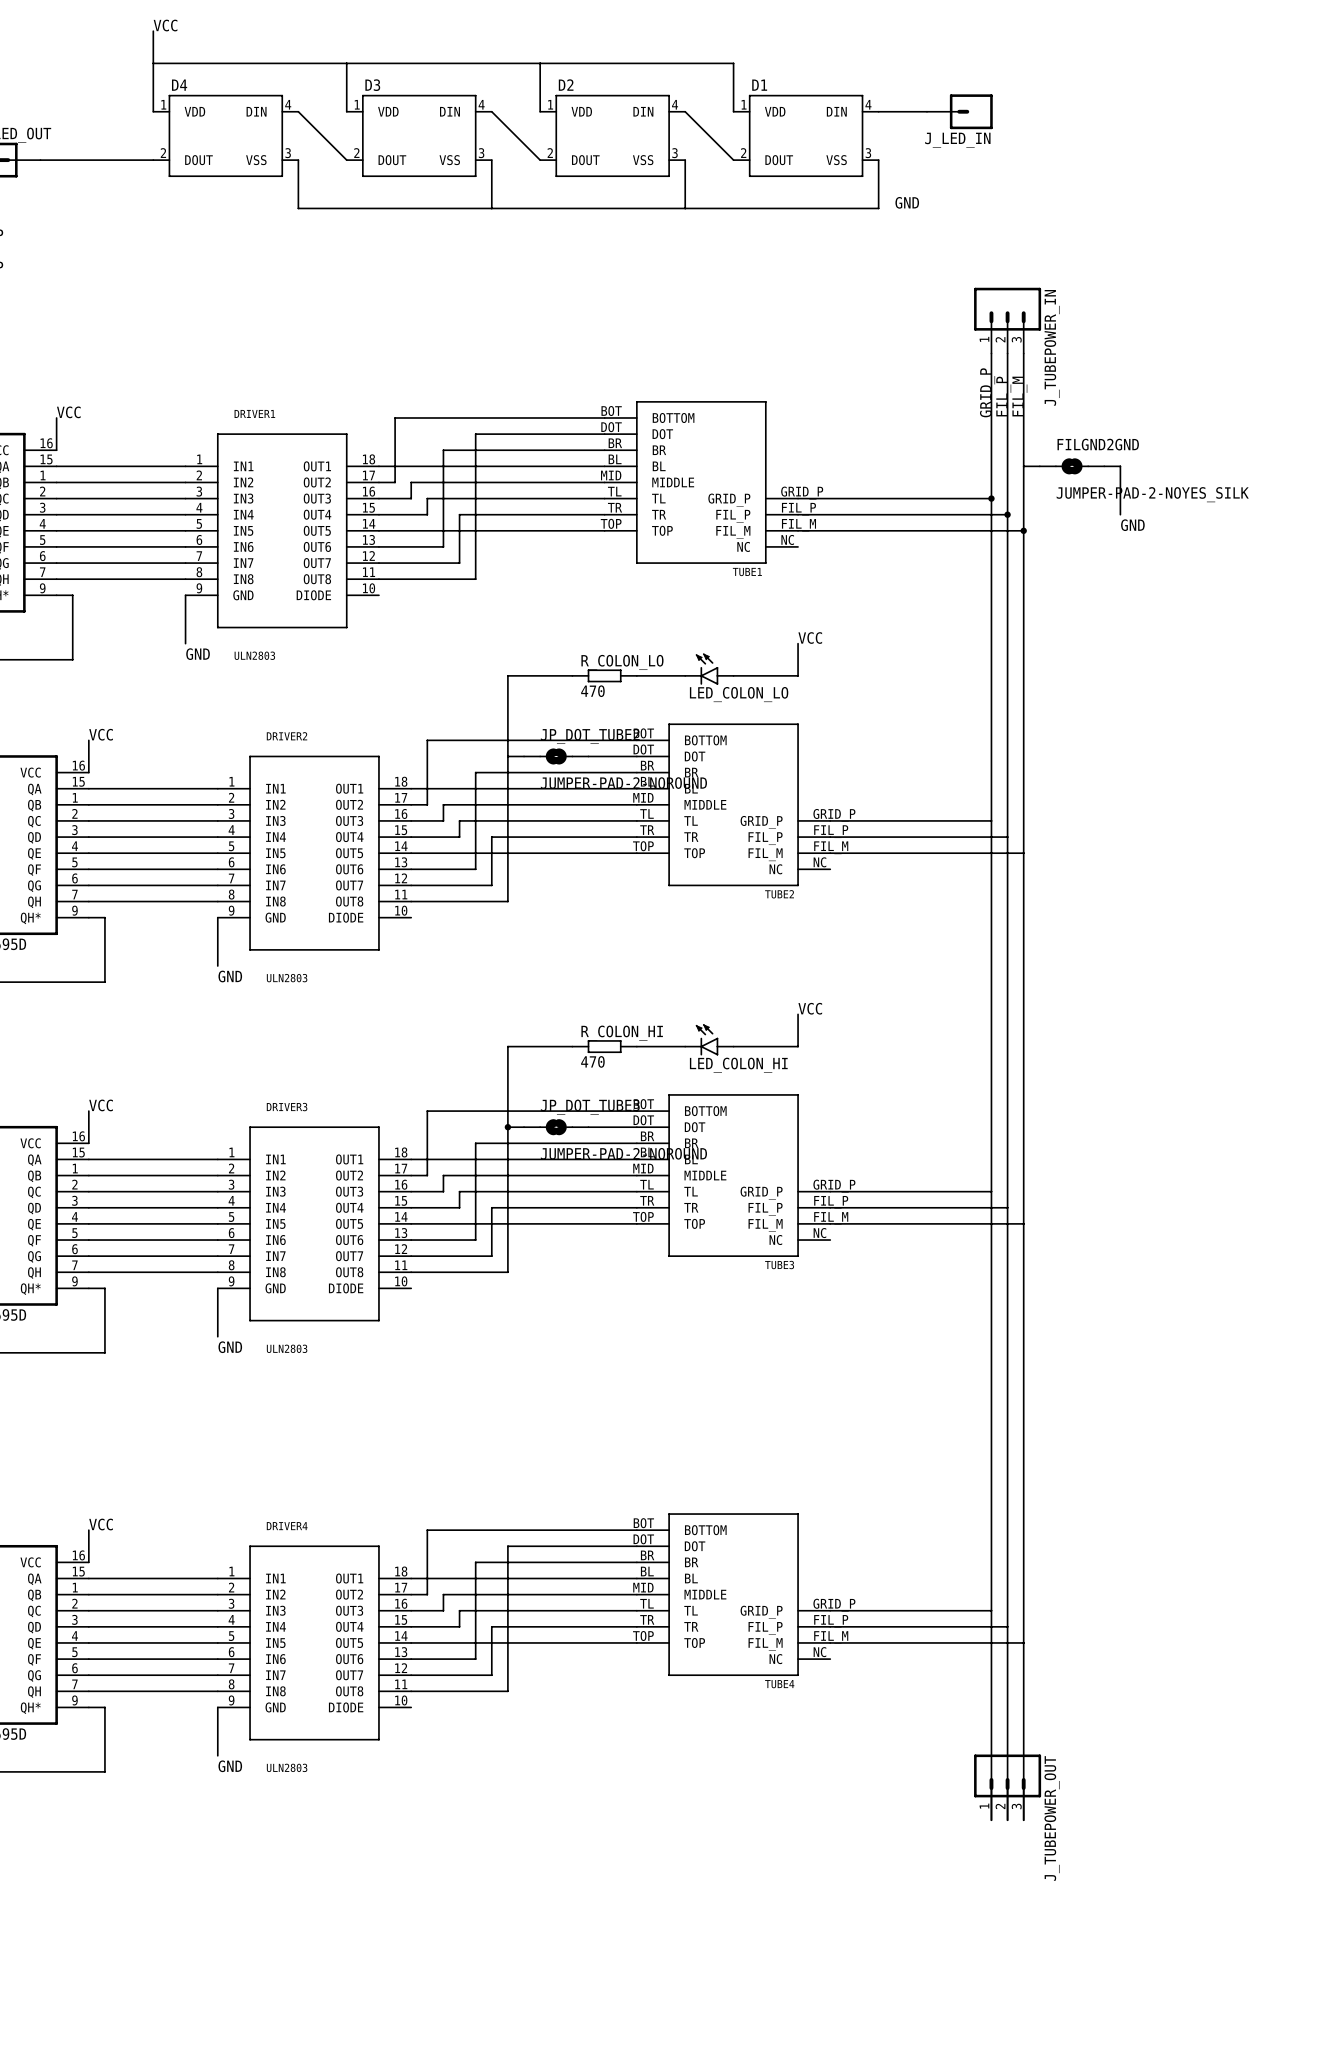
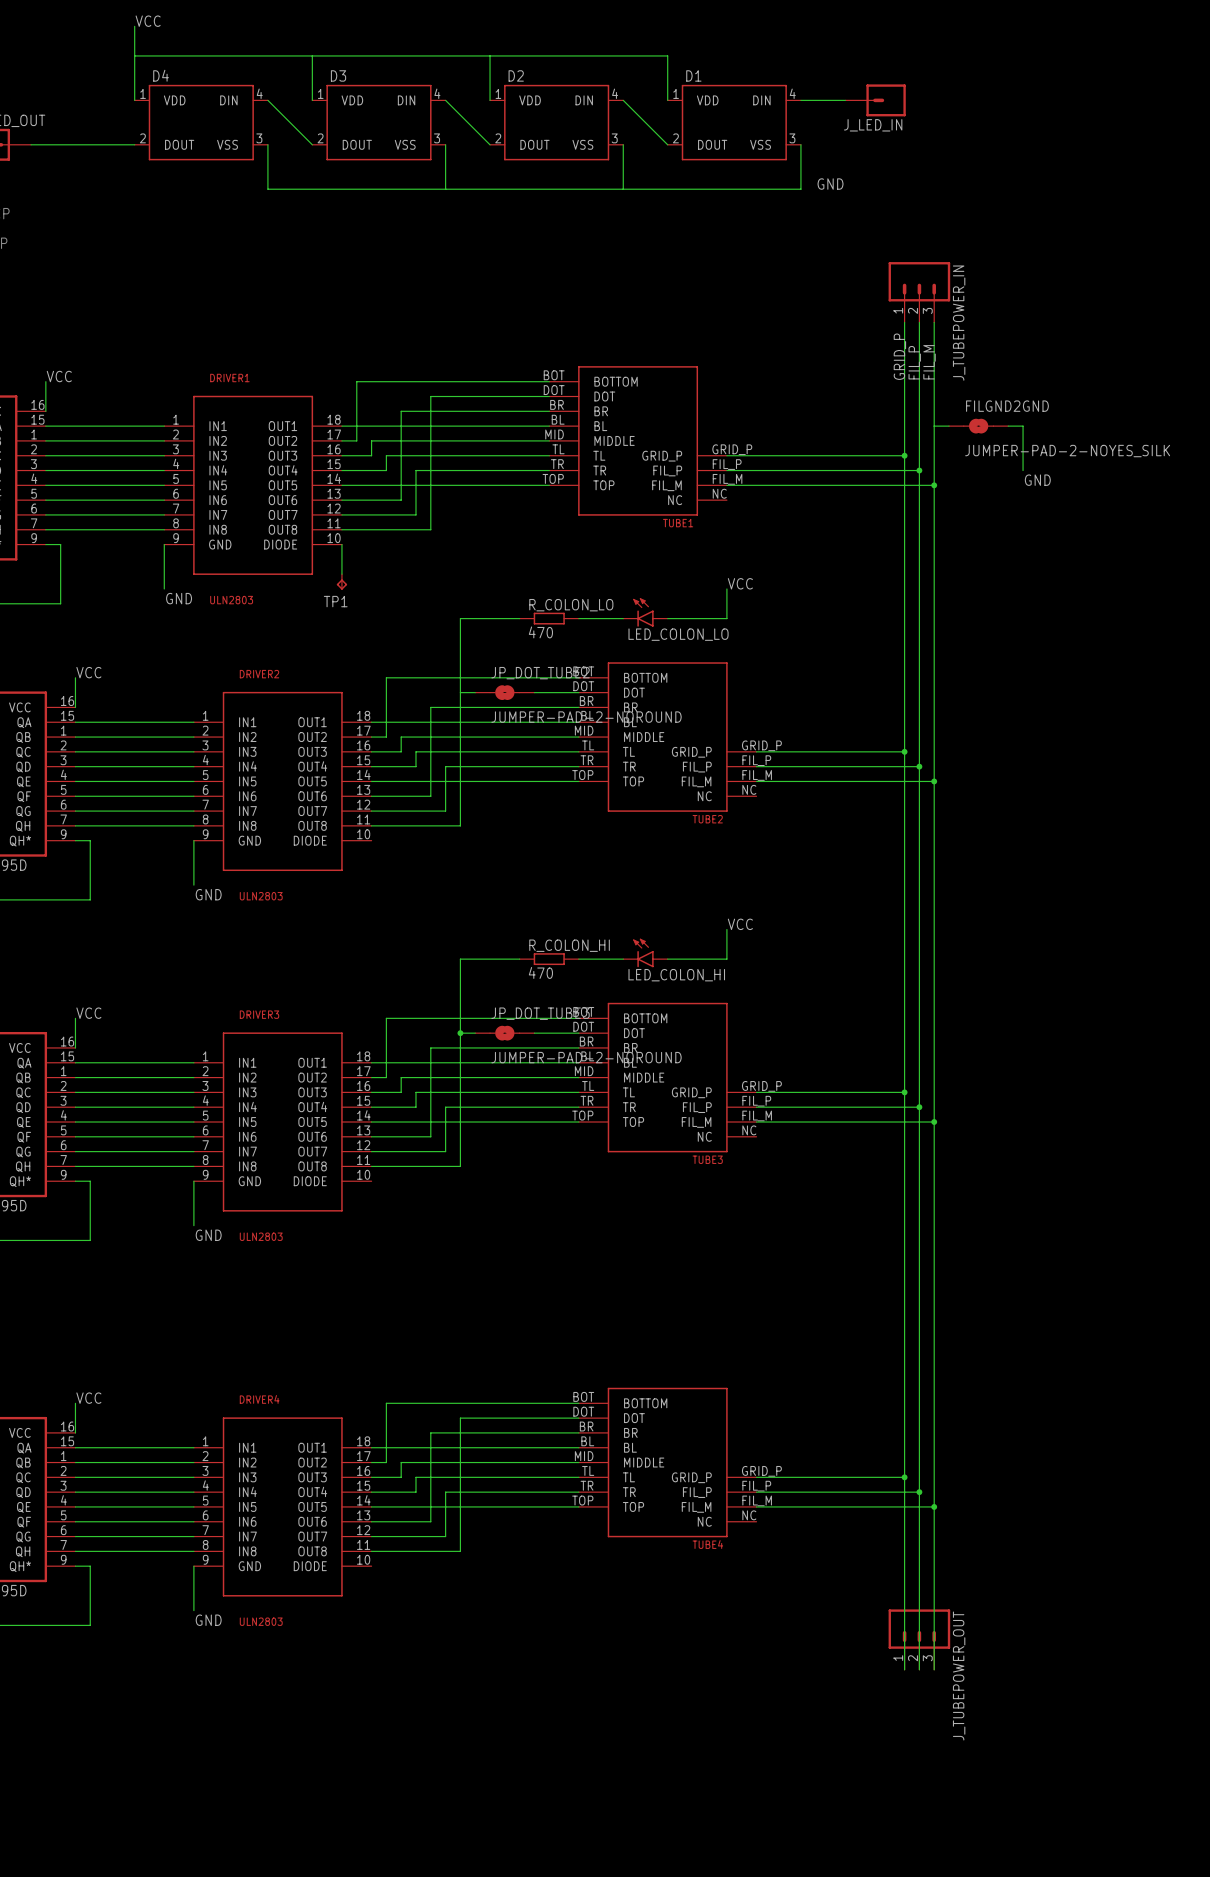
wire: none -> (341, 544) (341, 574)
TP1: none -> (341, 581)
junction: none -> (904, 751)
junction: none -> (919, 766)
junction: none -> (934, 781)
junction: none -> (904, 1092)
junction: none -> (919, 1107)
junction: none -> (934, 1122)
junction: none -> (904, 1477)
junction: none -> (919, 1492)
junction: none -> (934, 1506)

